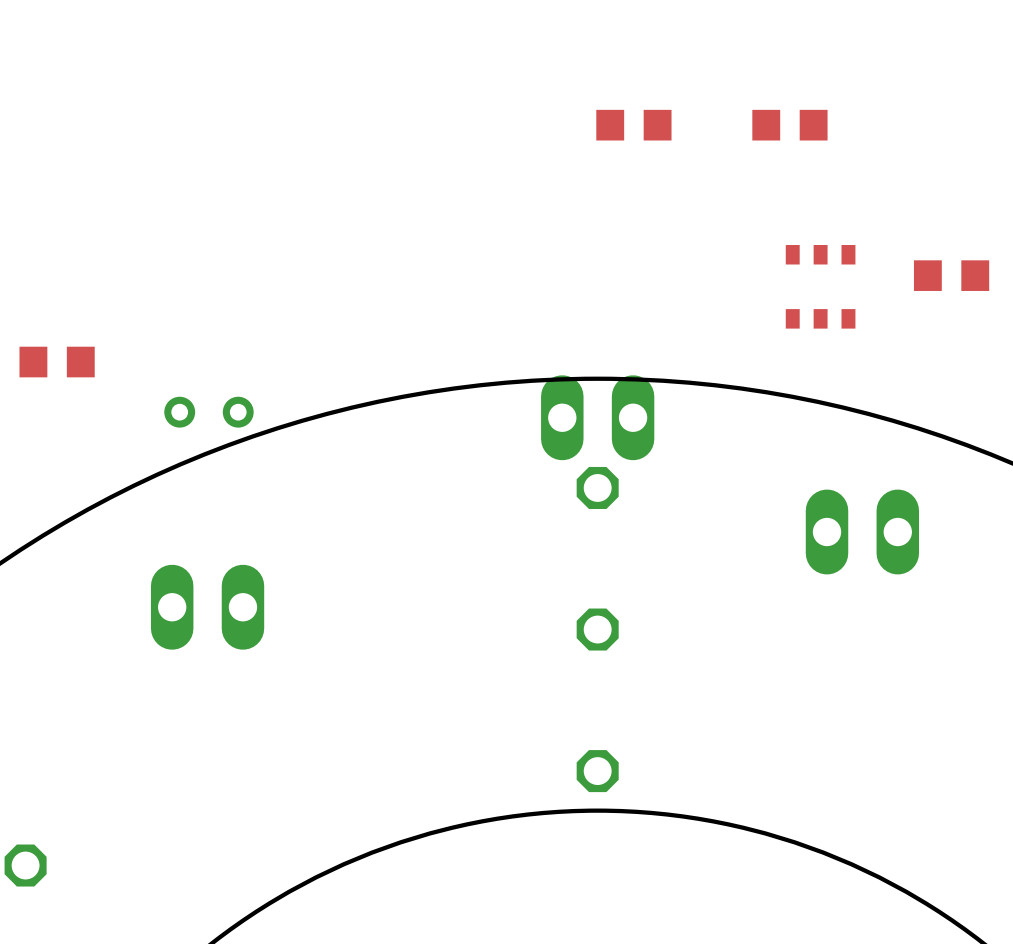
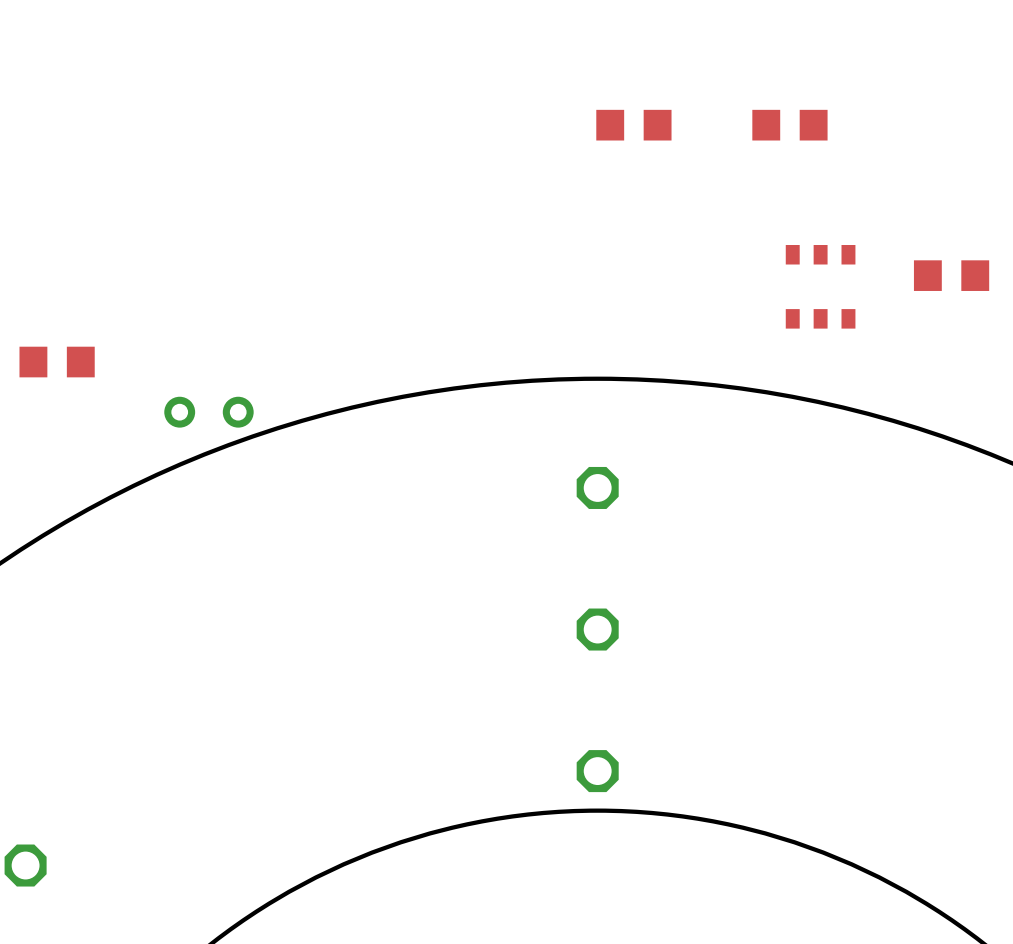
part: (597, 417) -> none
part: (862, 532) -> none
part: (207, 607) -> none

